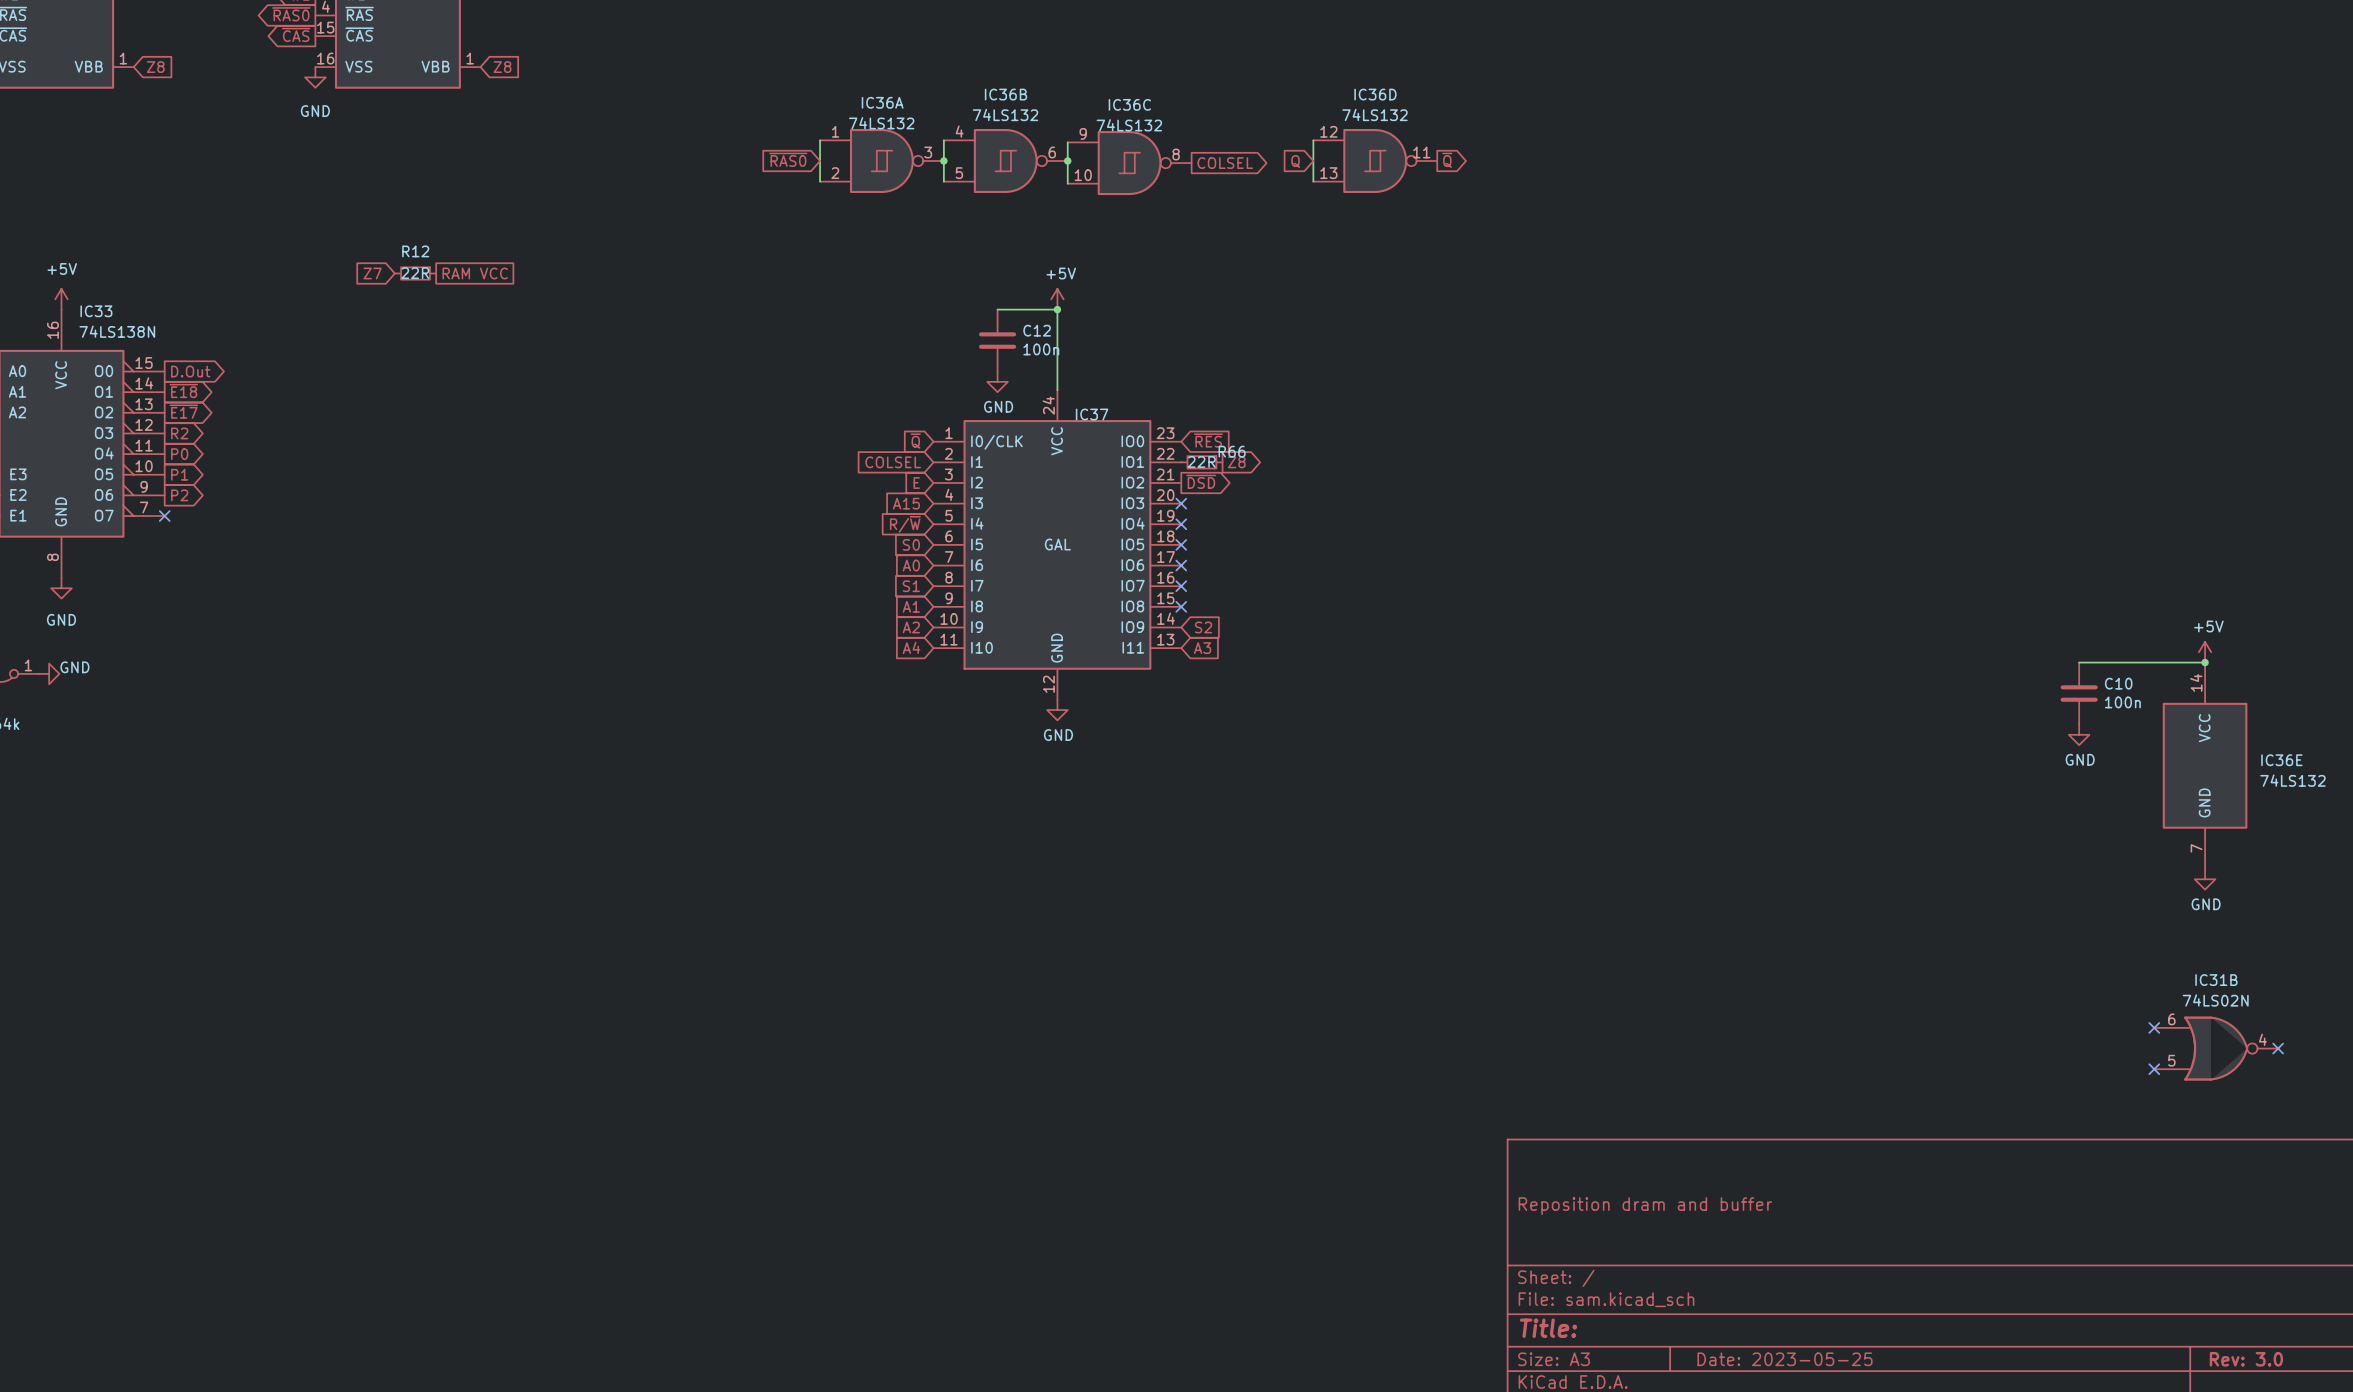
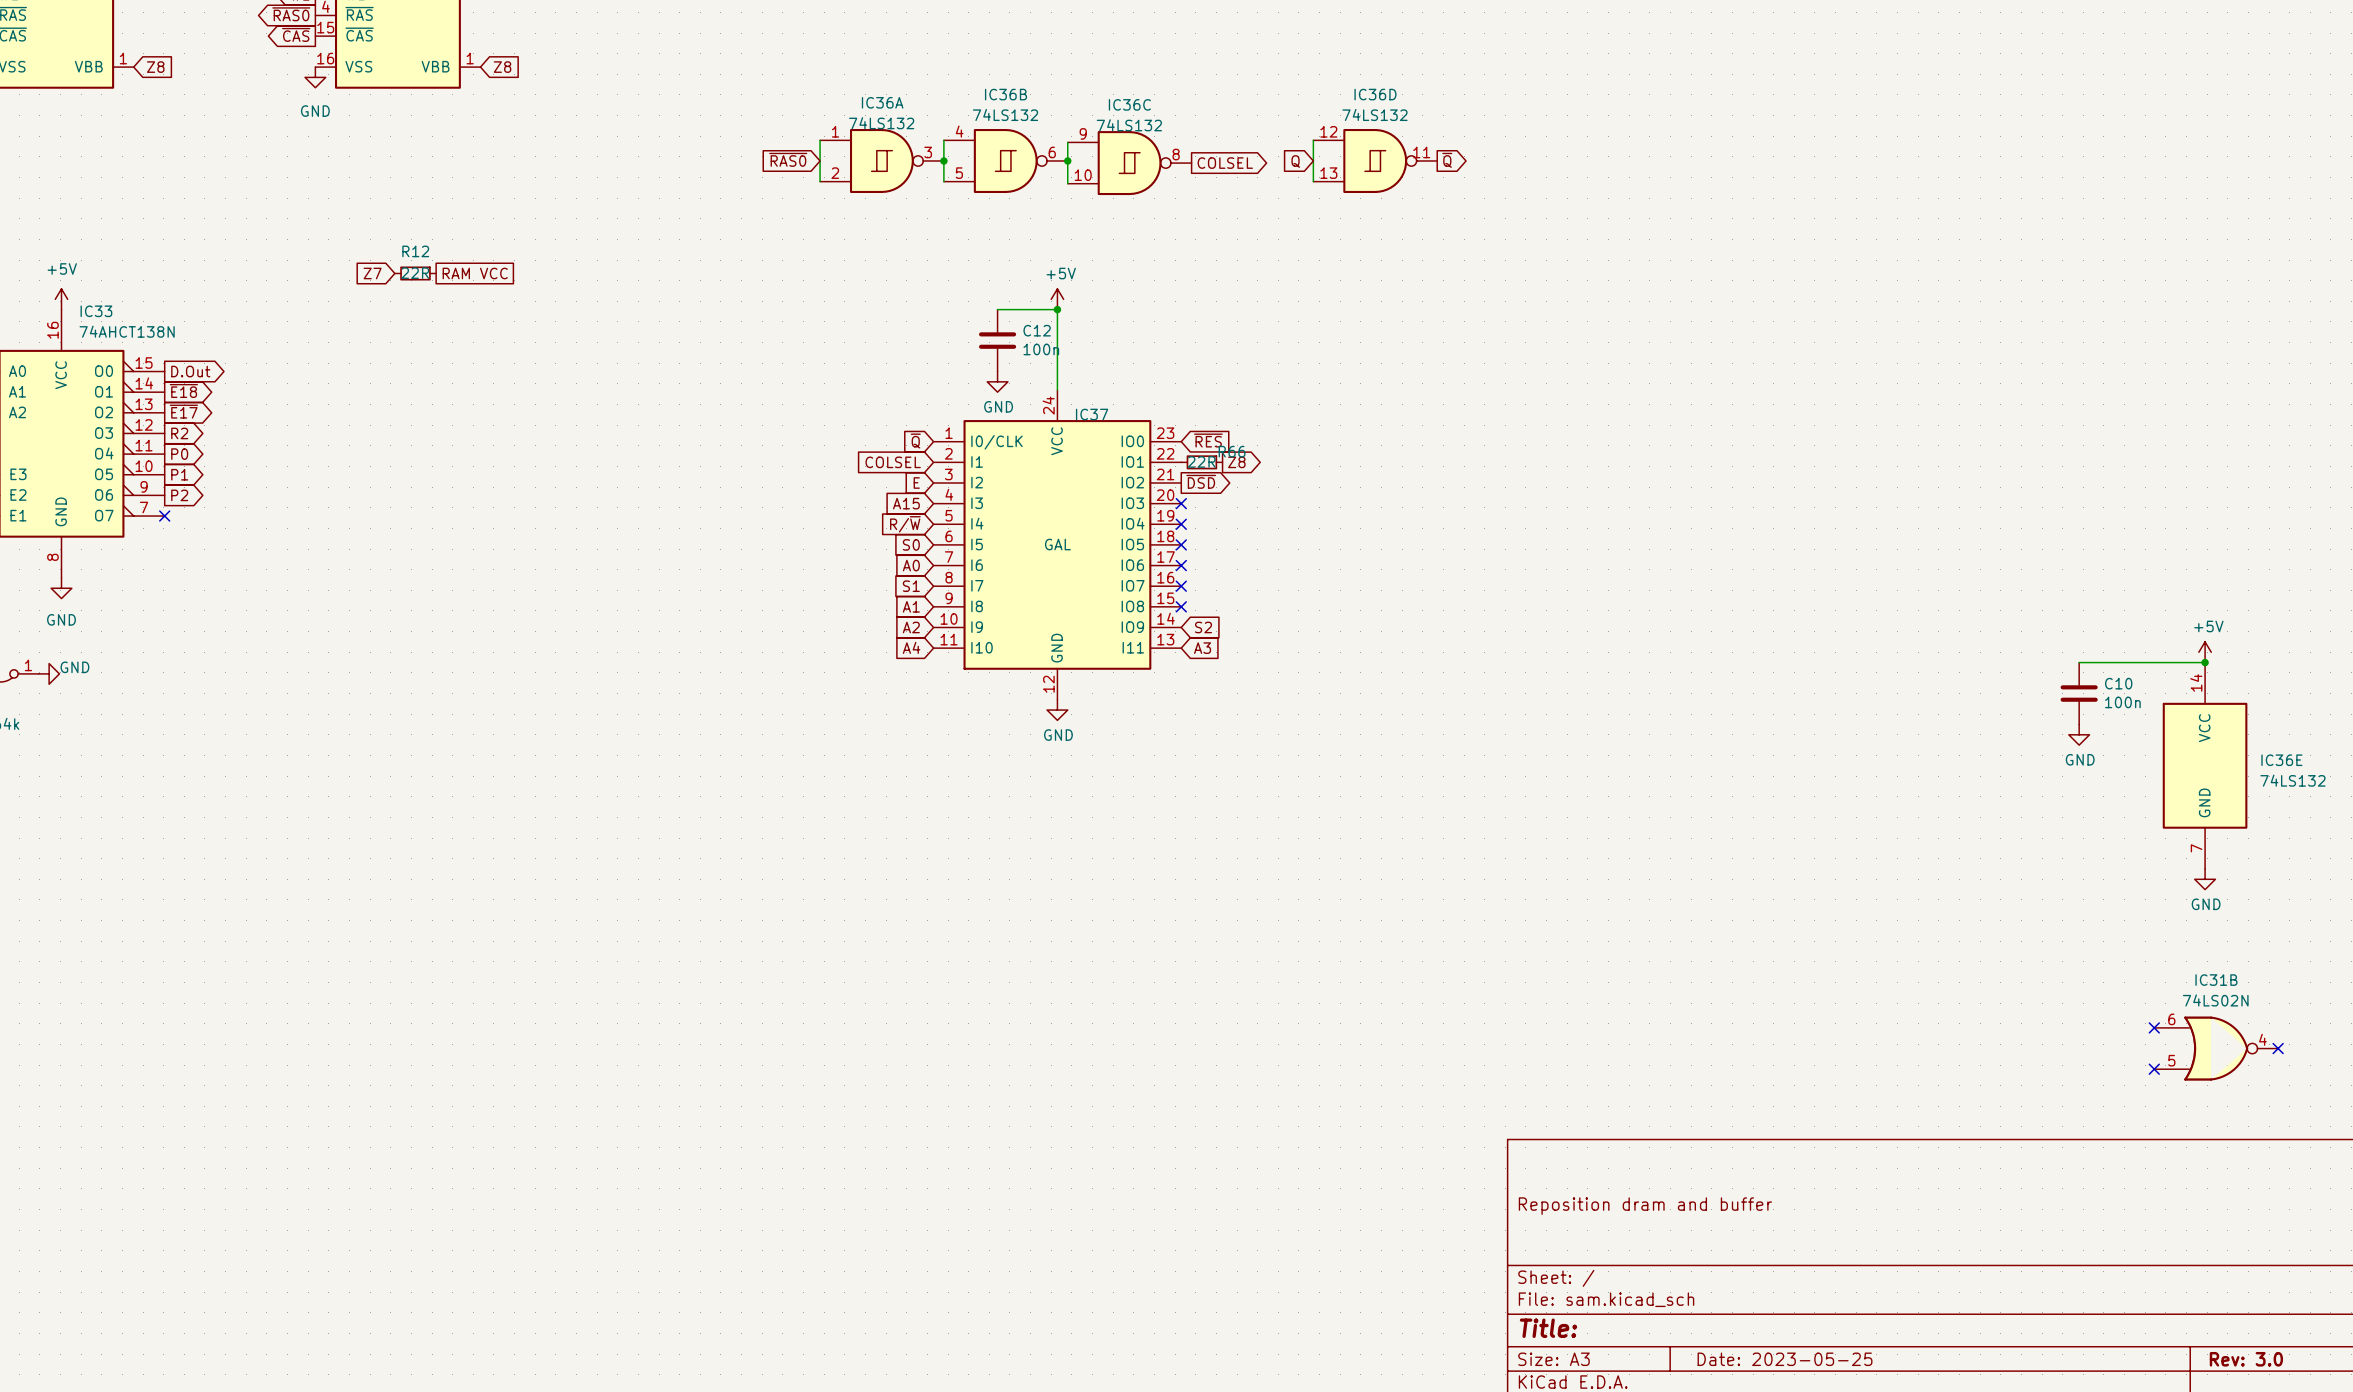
IC33 value: 74LS138N (117, 331) -> 74AHCT138N (127, 331)

